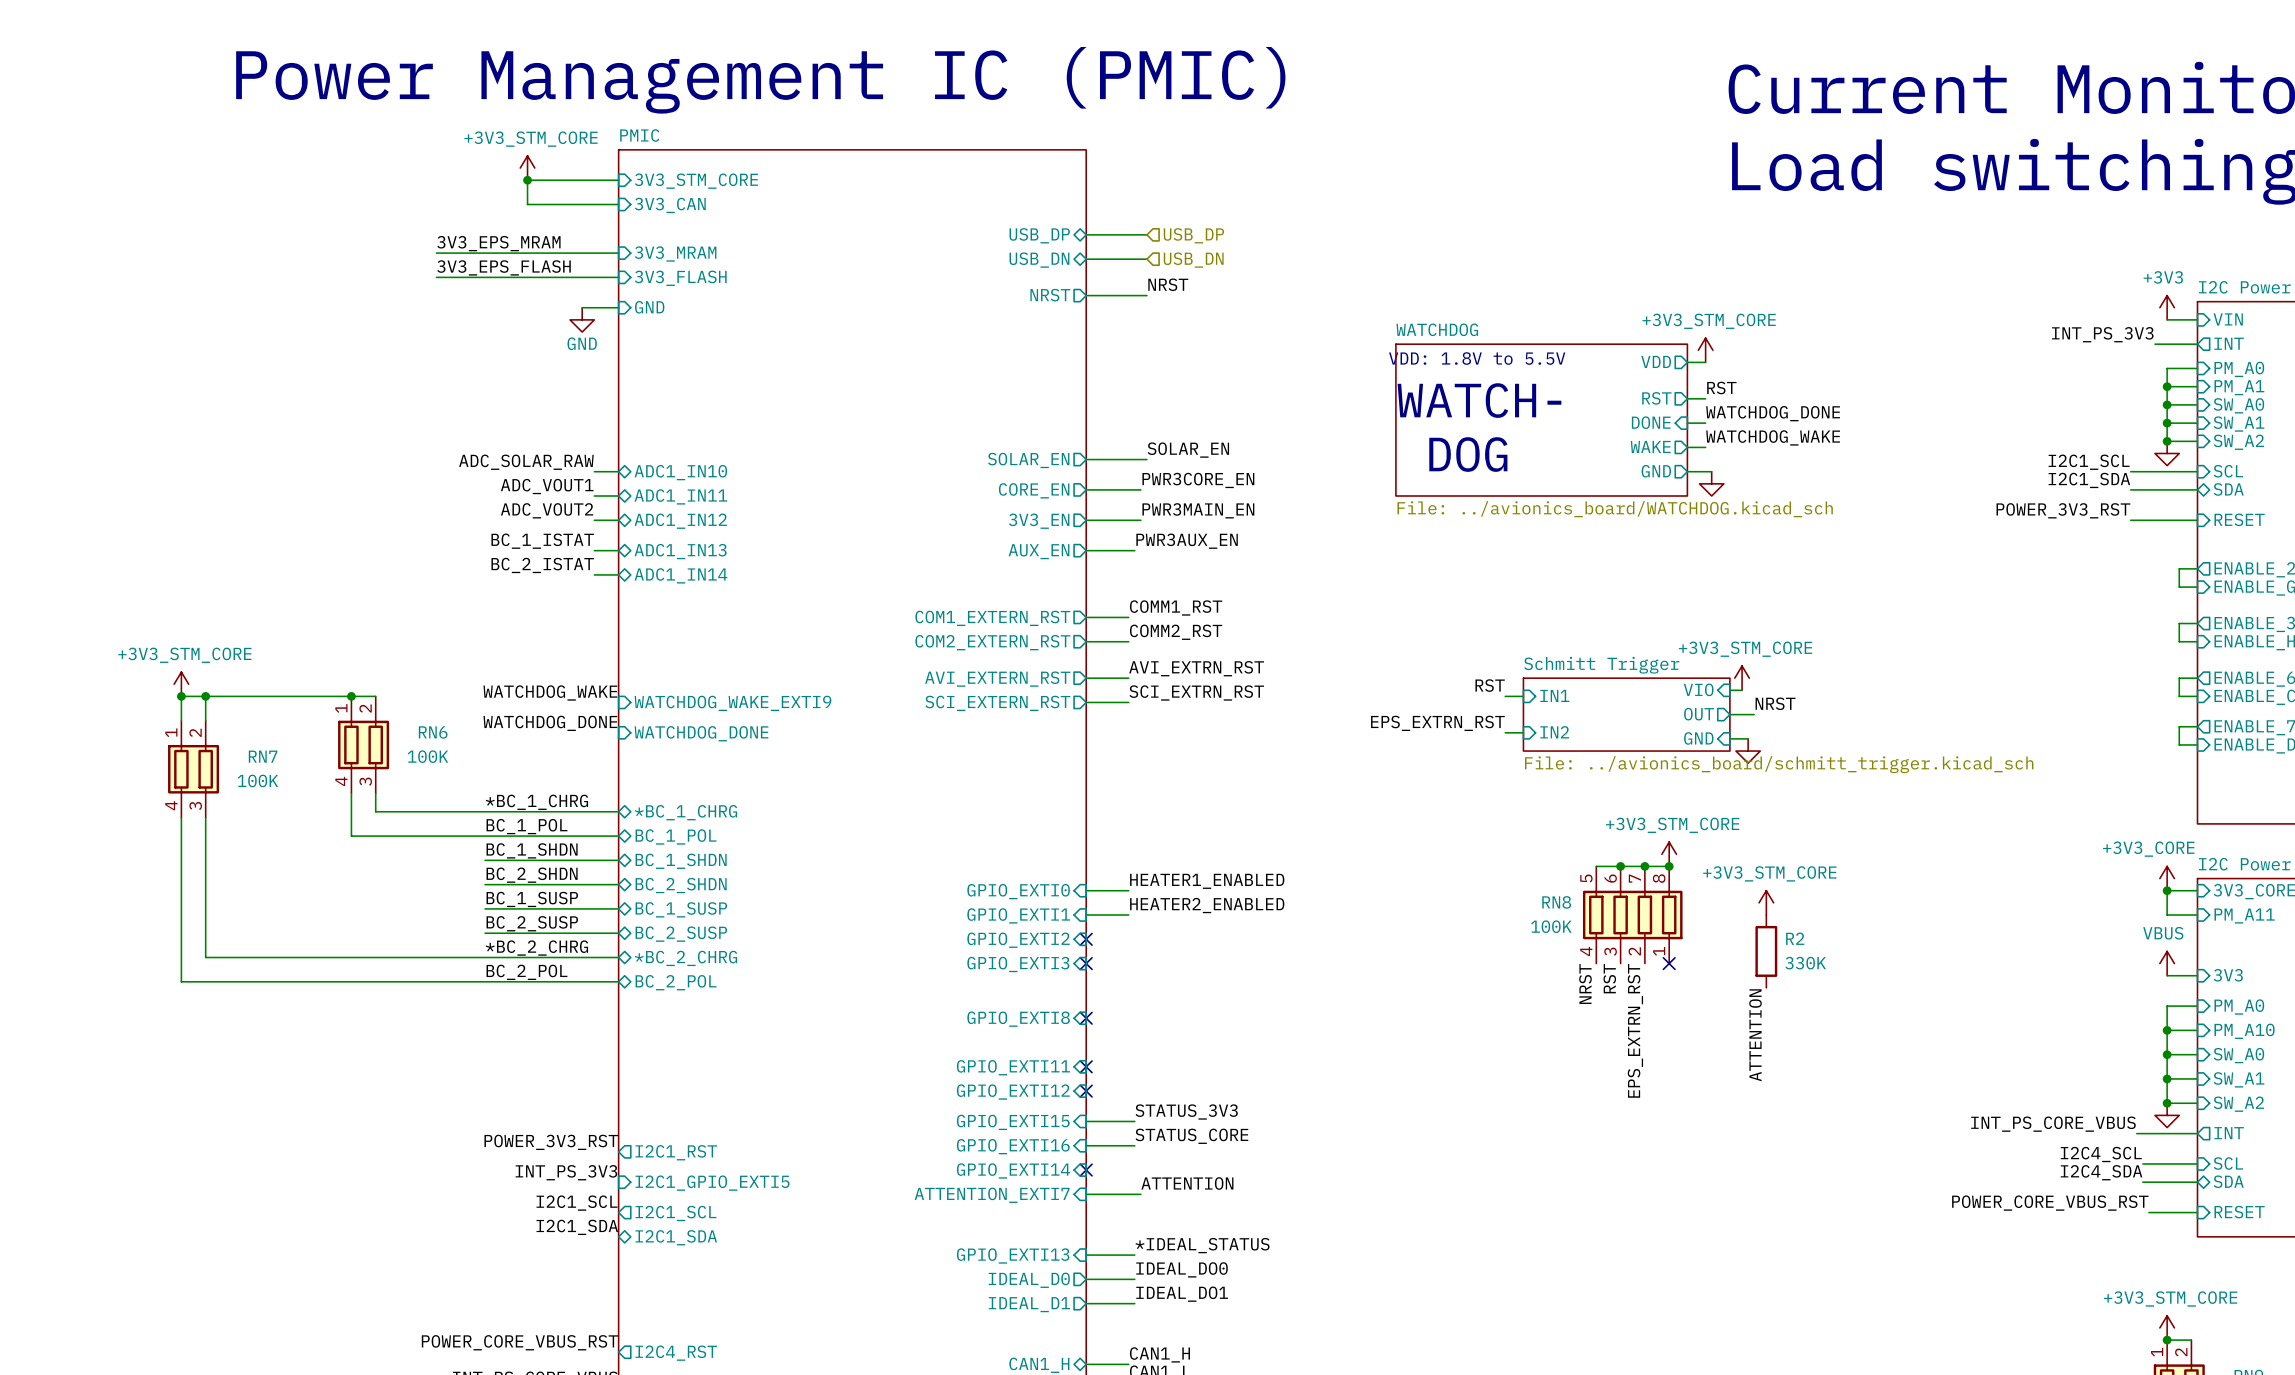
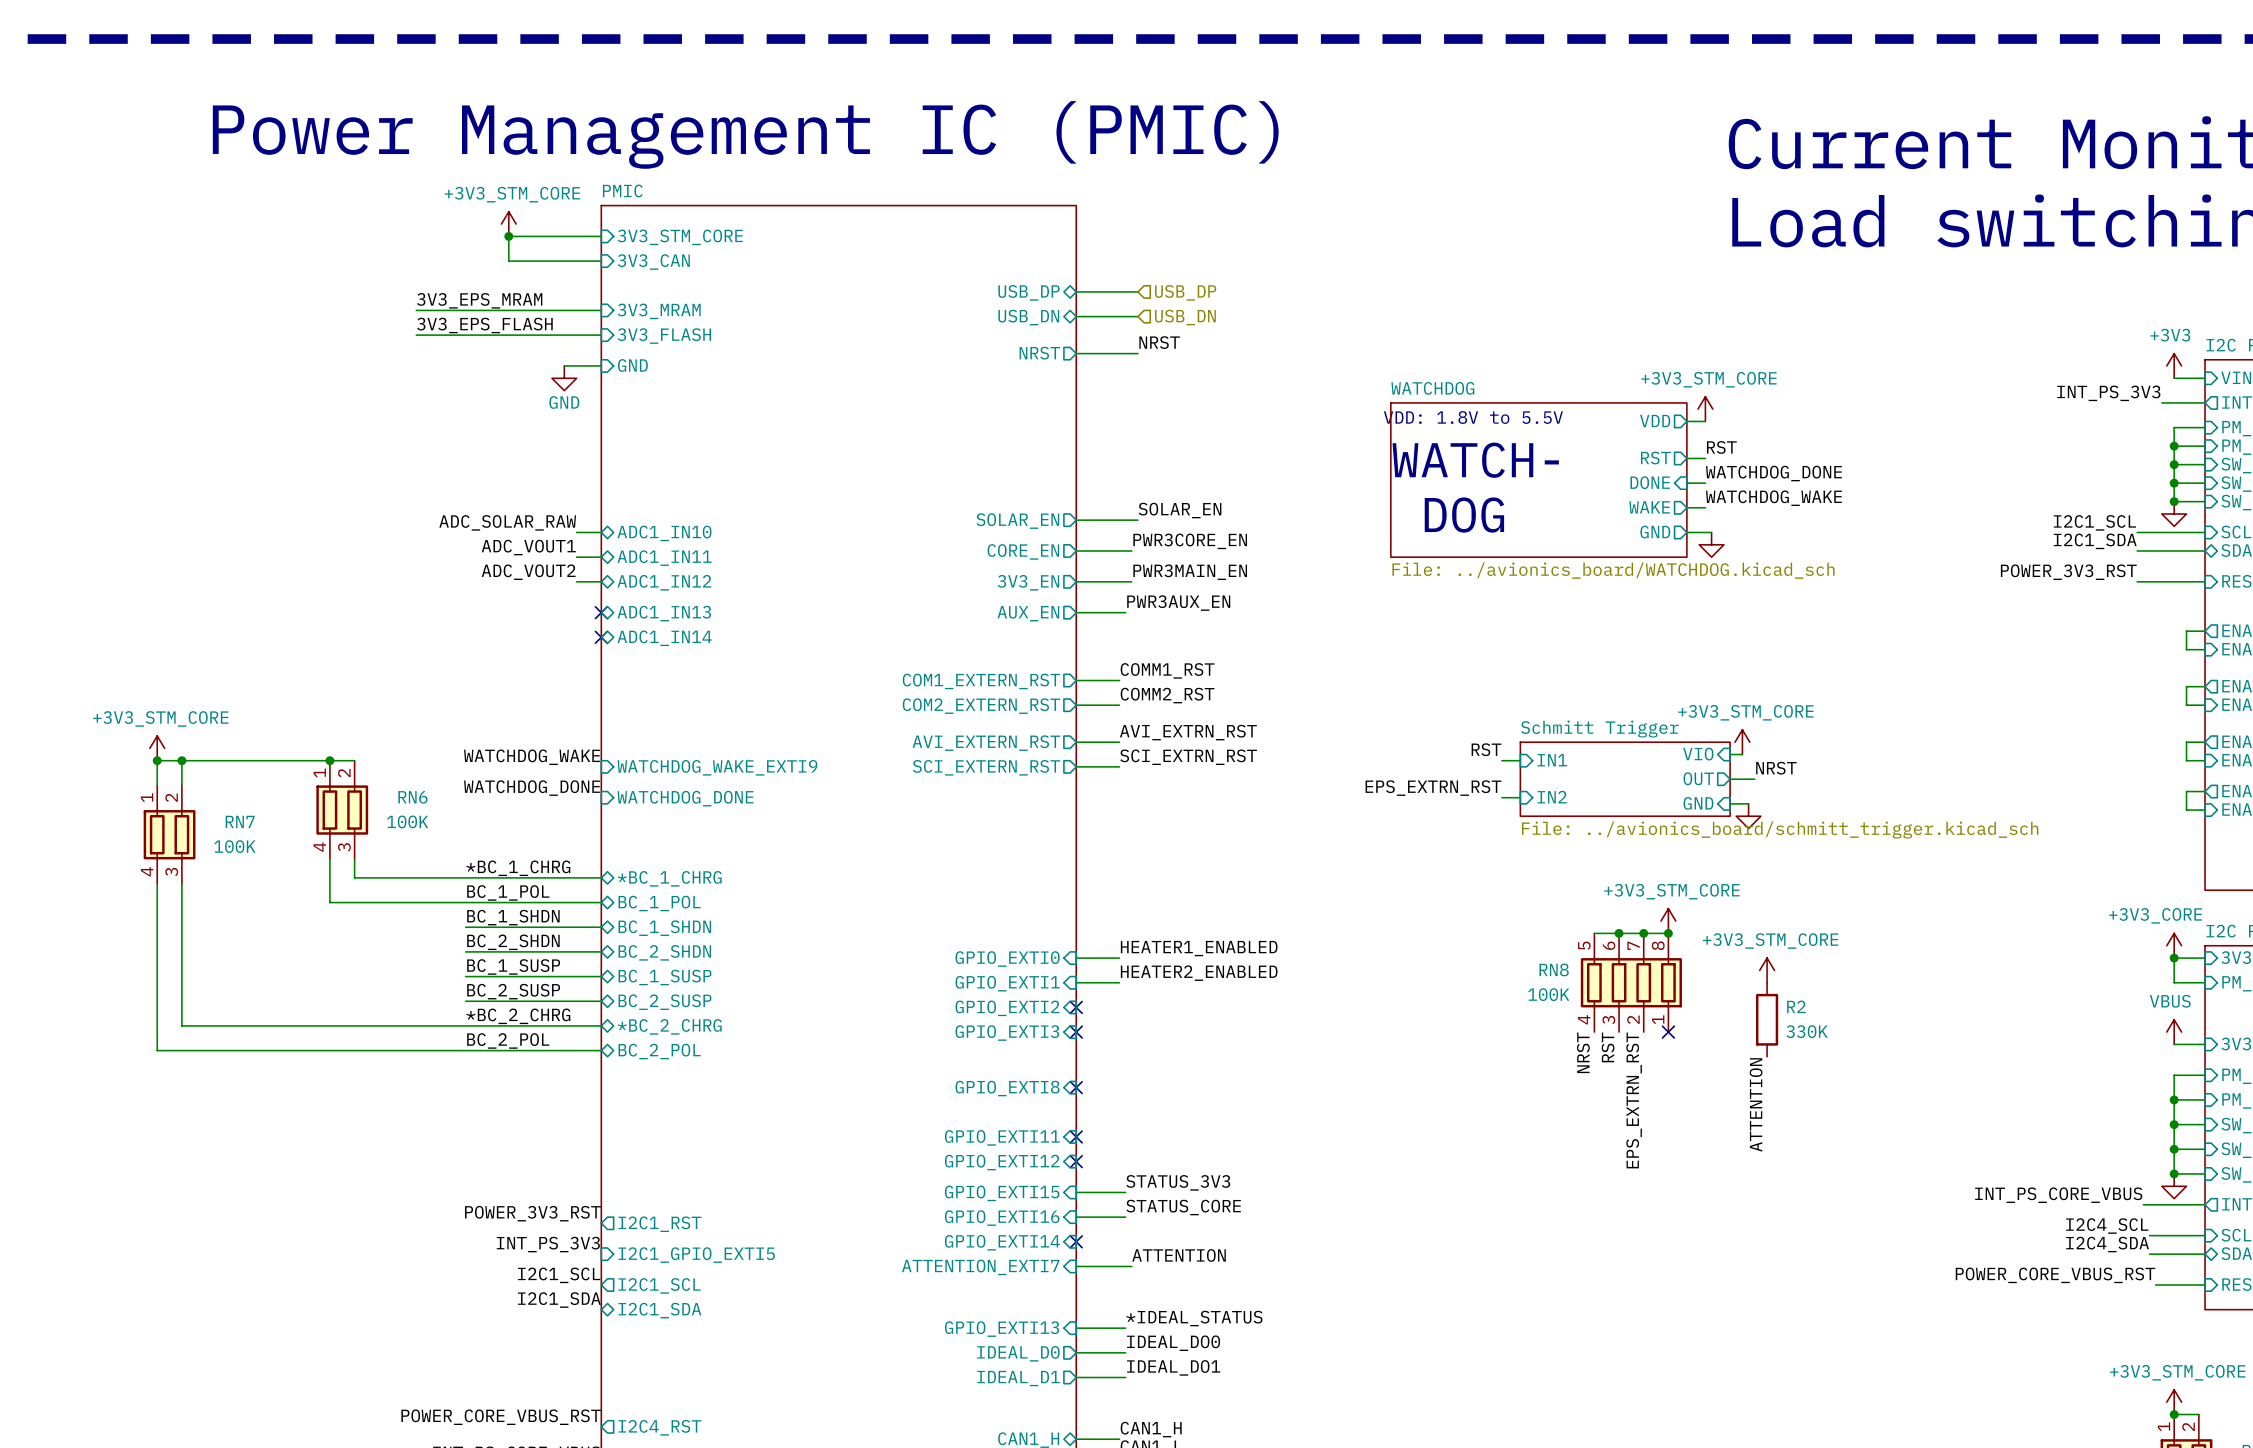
label: BC_1_ISTAT (542, 541) -> none
wire: (594, 550) (618, 550) -> none
no-connect mark: none -> (601, 612)
label: BC_2_ISTAT (542, 565) -> none
wire: (594, 574) (618, 574) -> none
no-connect mark: none -> (601, 637)

